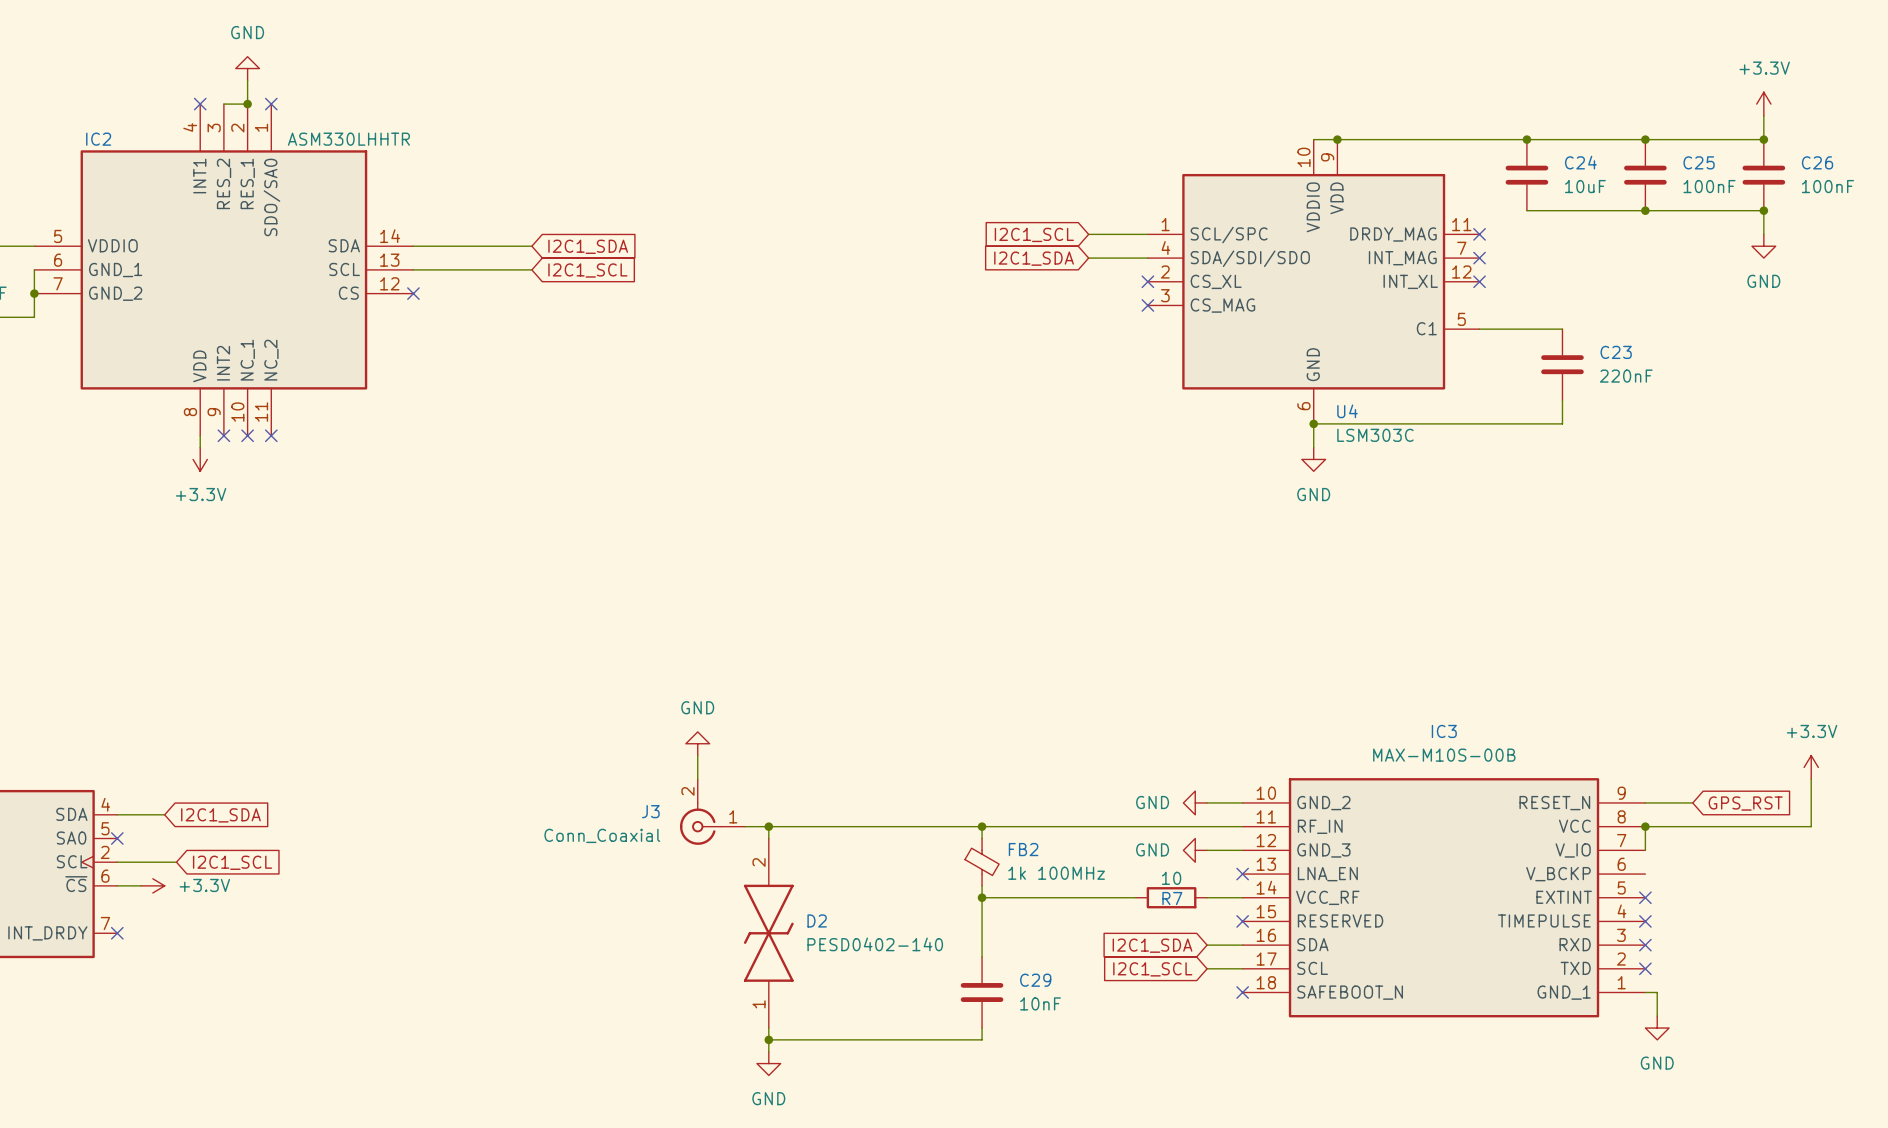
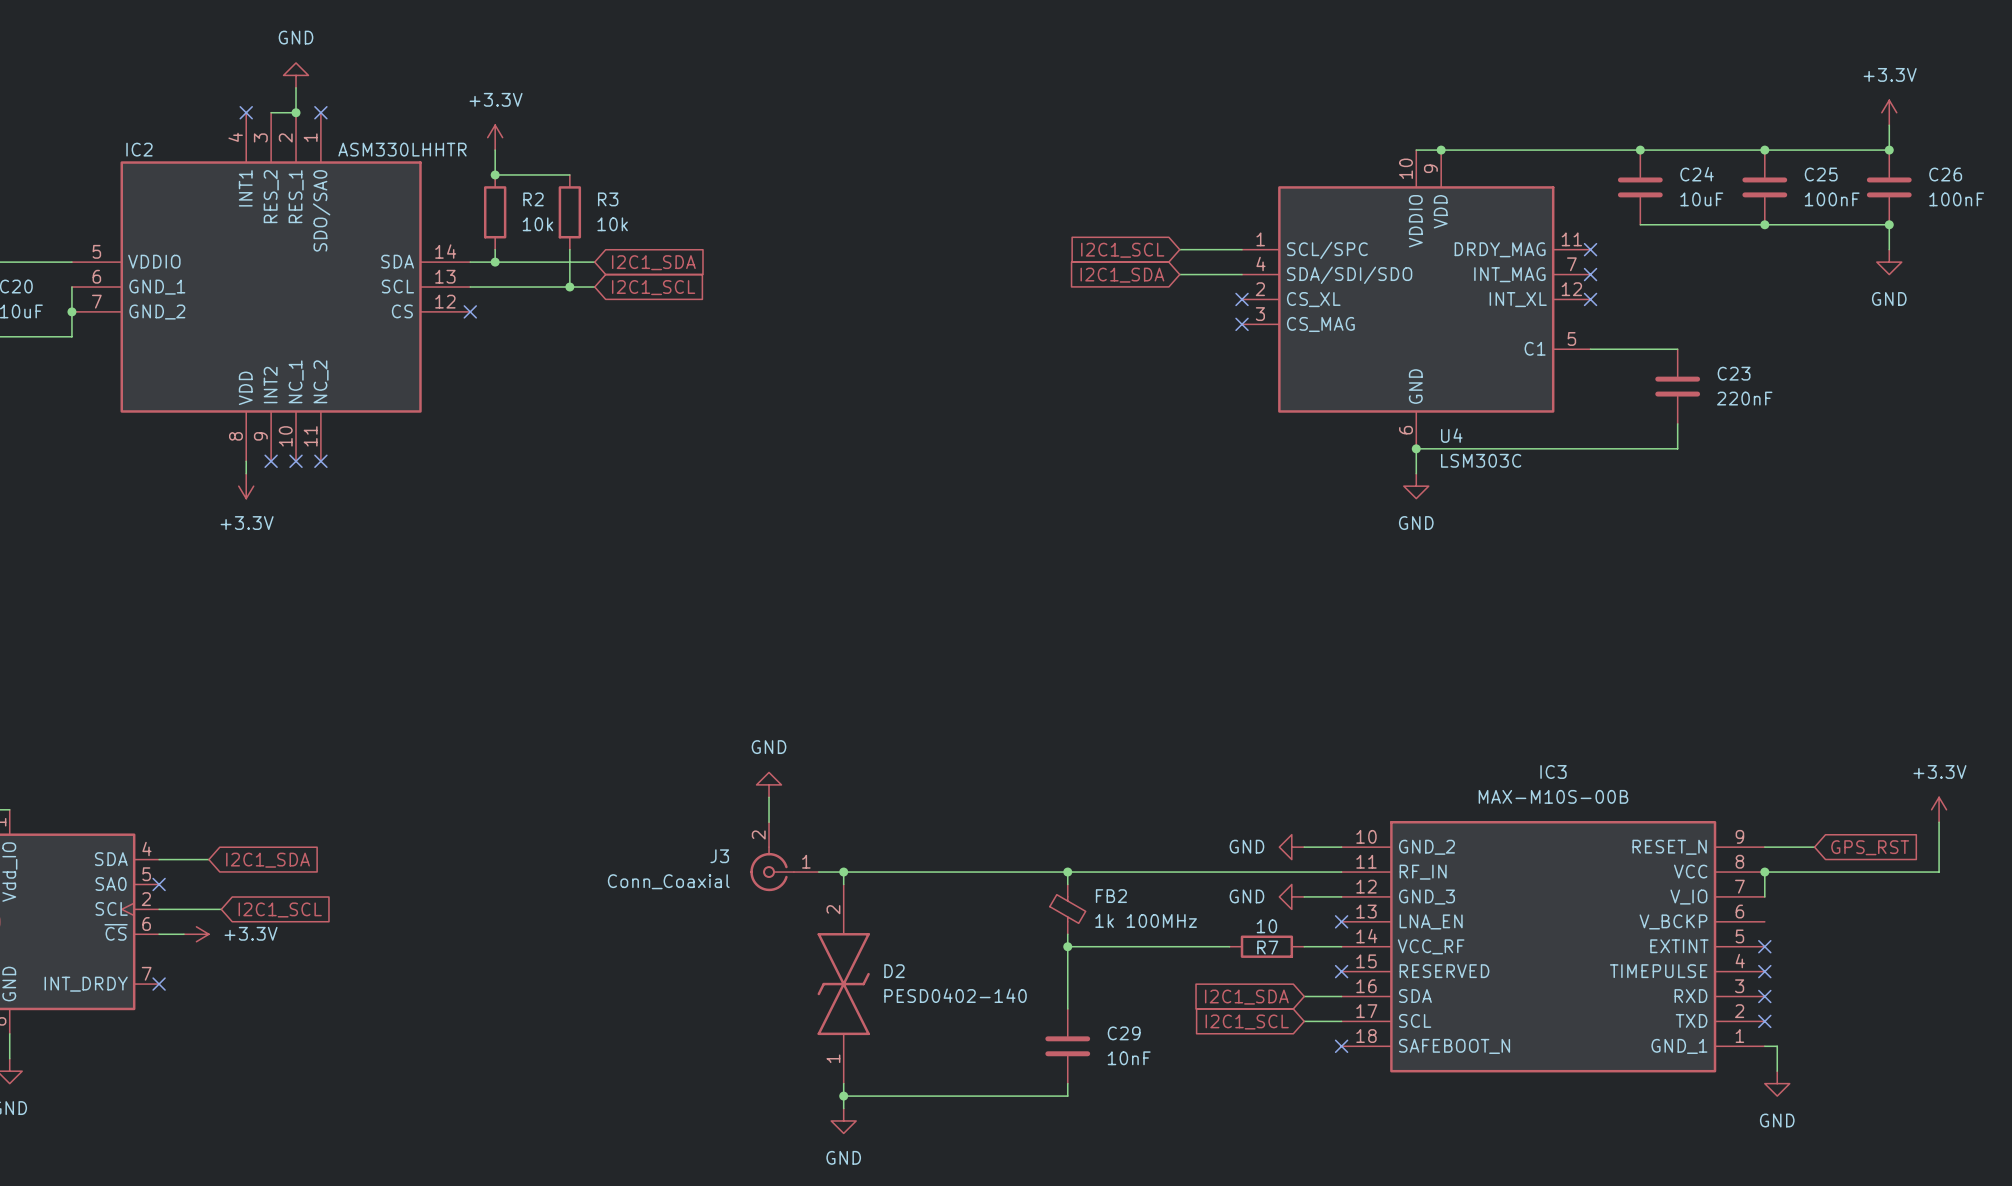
power symbol: none -> +3.3V (495, 137)
wire: none -> (495, 150) (495, 174) (569, 174)
junction: none -> (495, 174)
R2: none -> 10k (495, 212)
R3: none -> 10k (569, 212)
wire: none -> (495, 249) (495, 262)
wire: none -> (569, 249) (569, 287)
junction: none -> (495, 262)
junction: none -> (569, 287)

